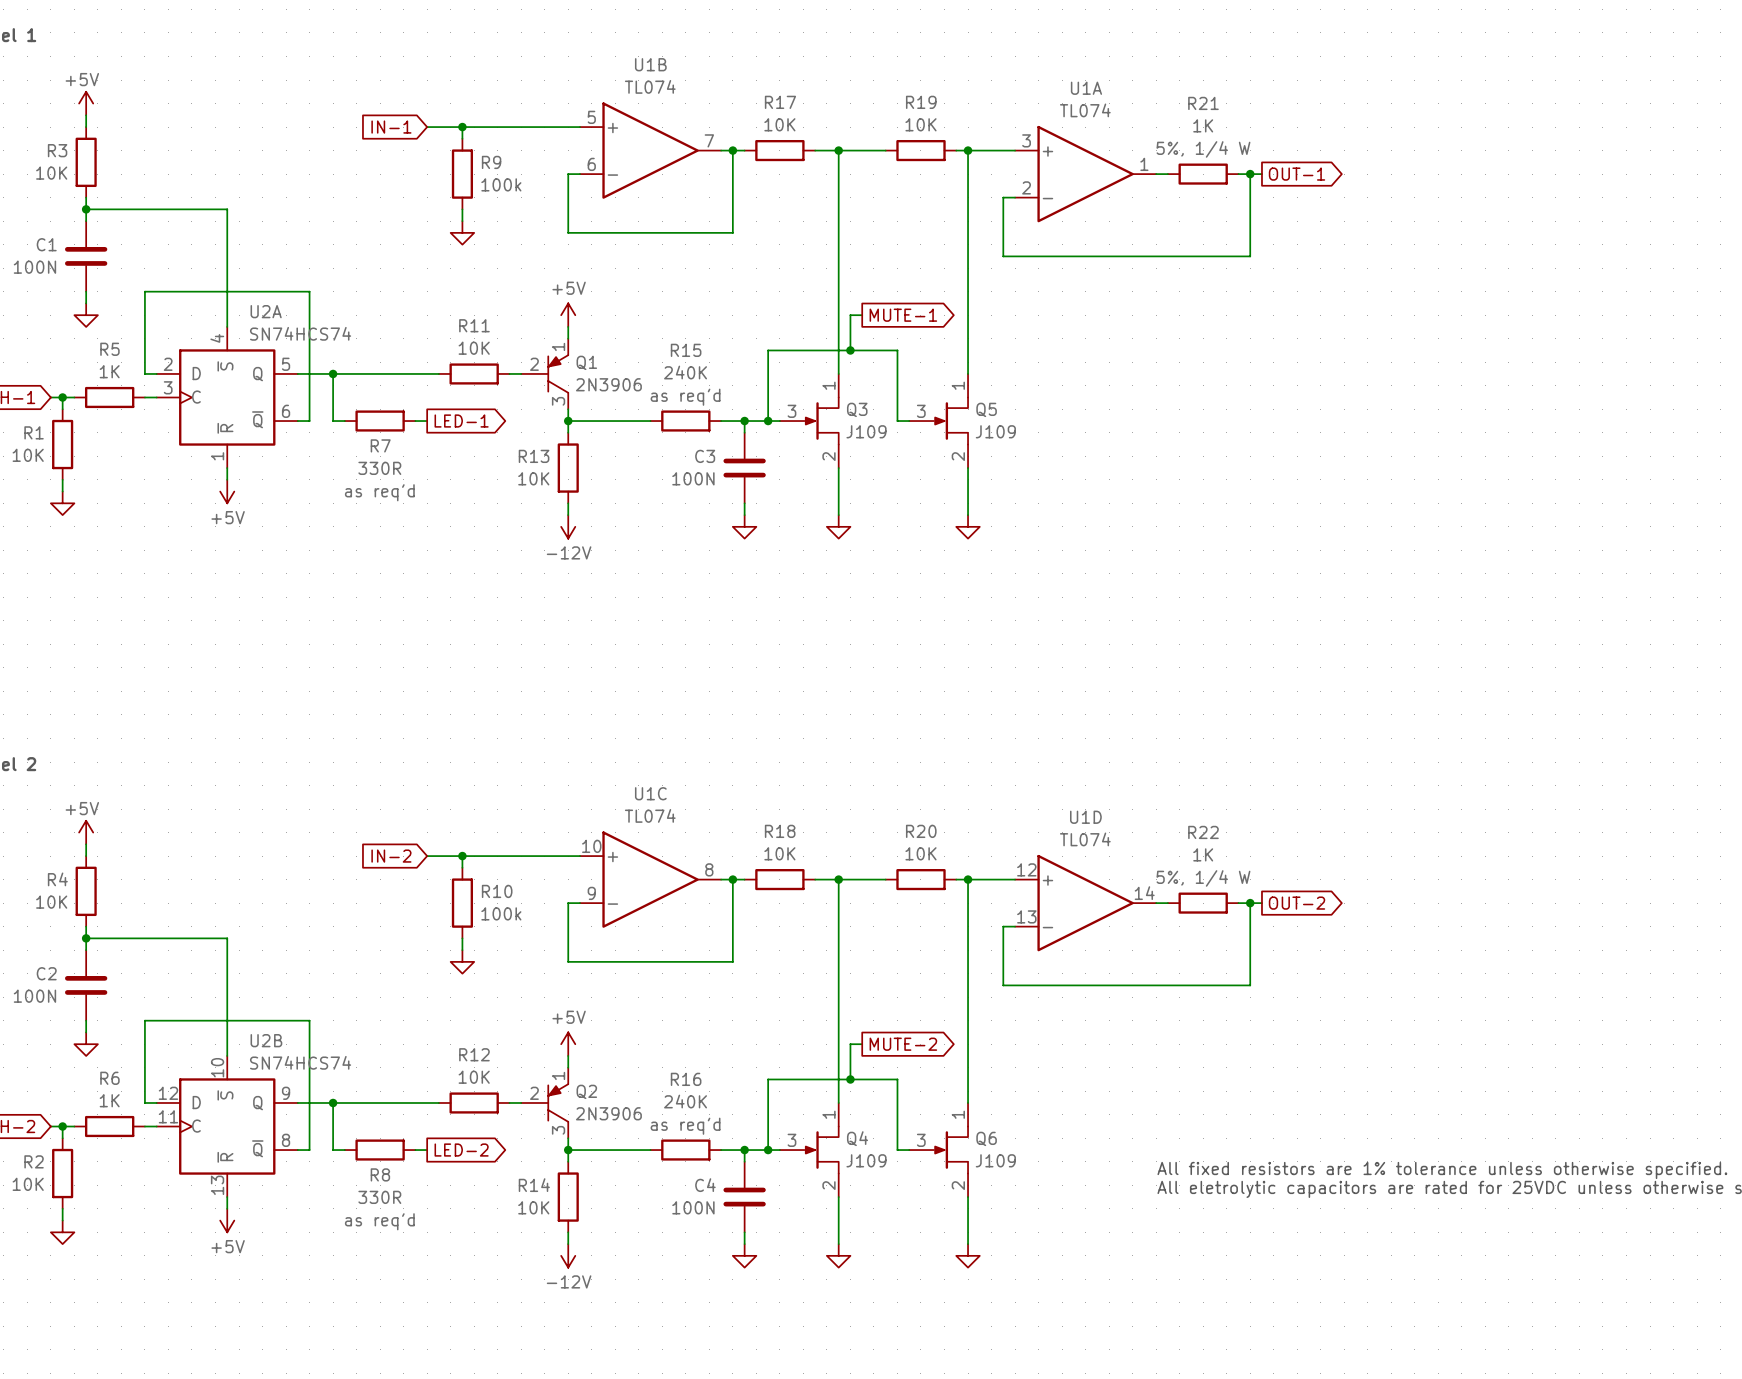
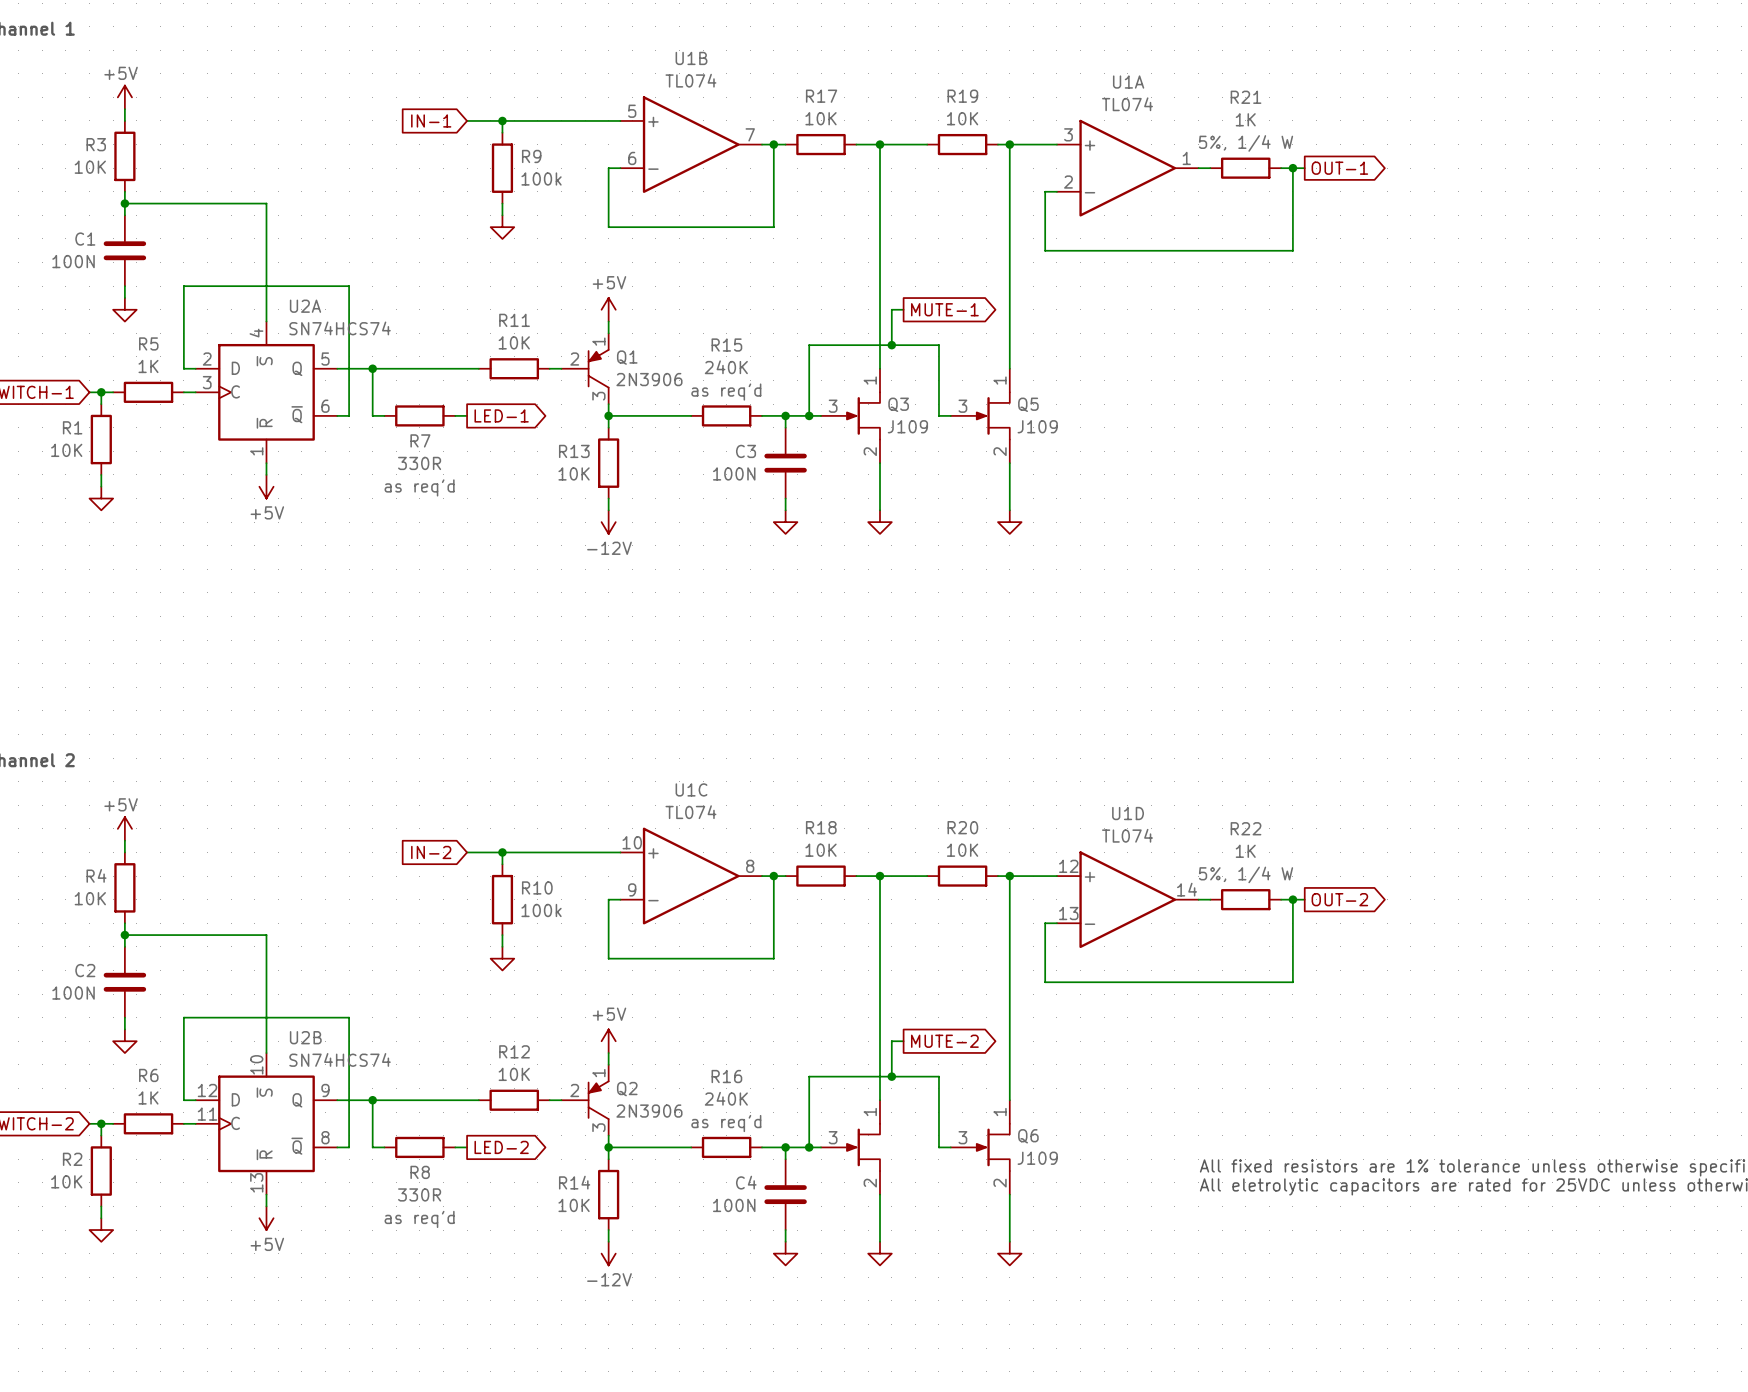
Q4 name: Q4 (857, 1138) -> none
Q4 value: J109 (866, 1160) -> none

